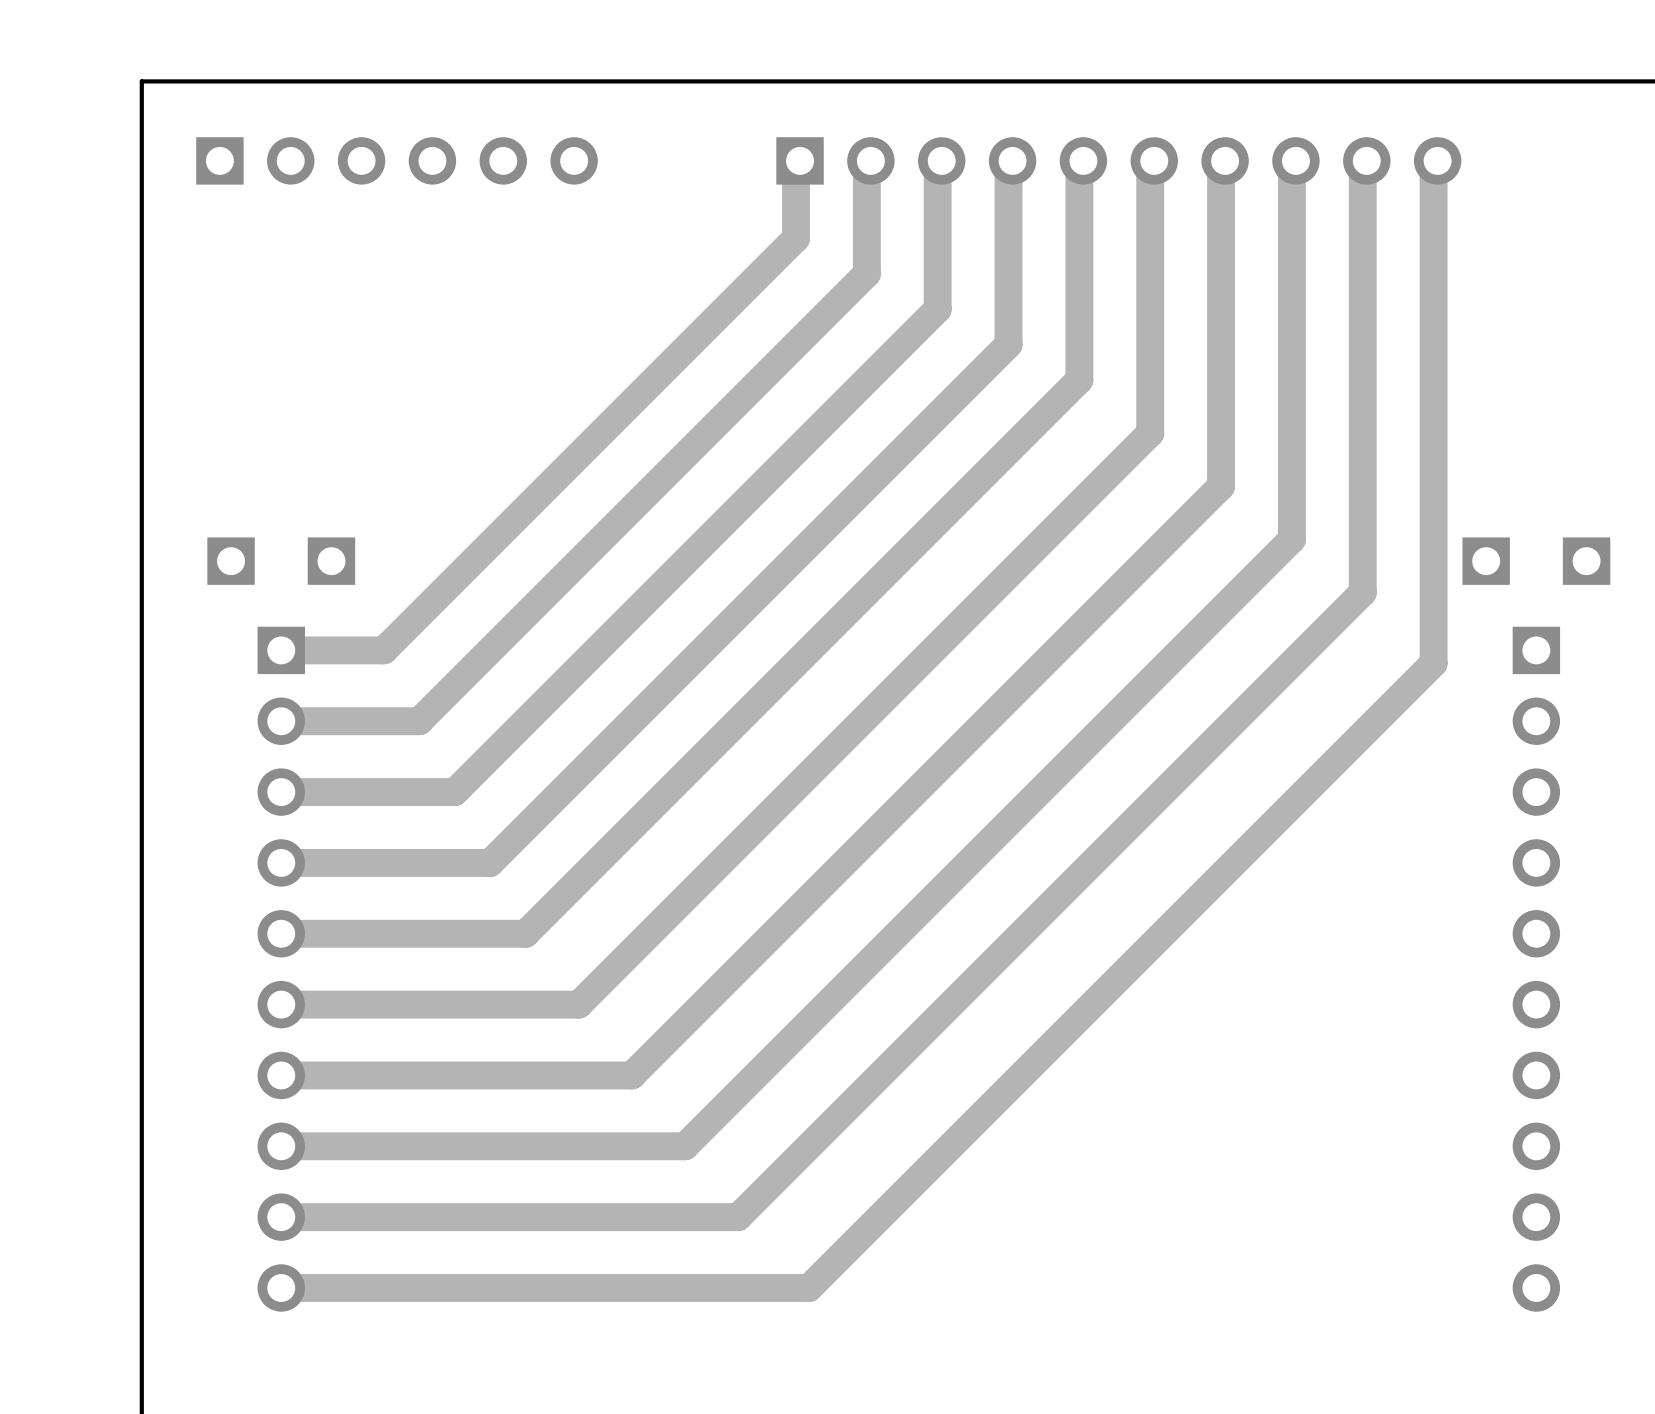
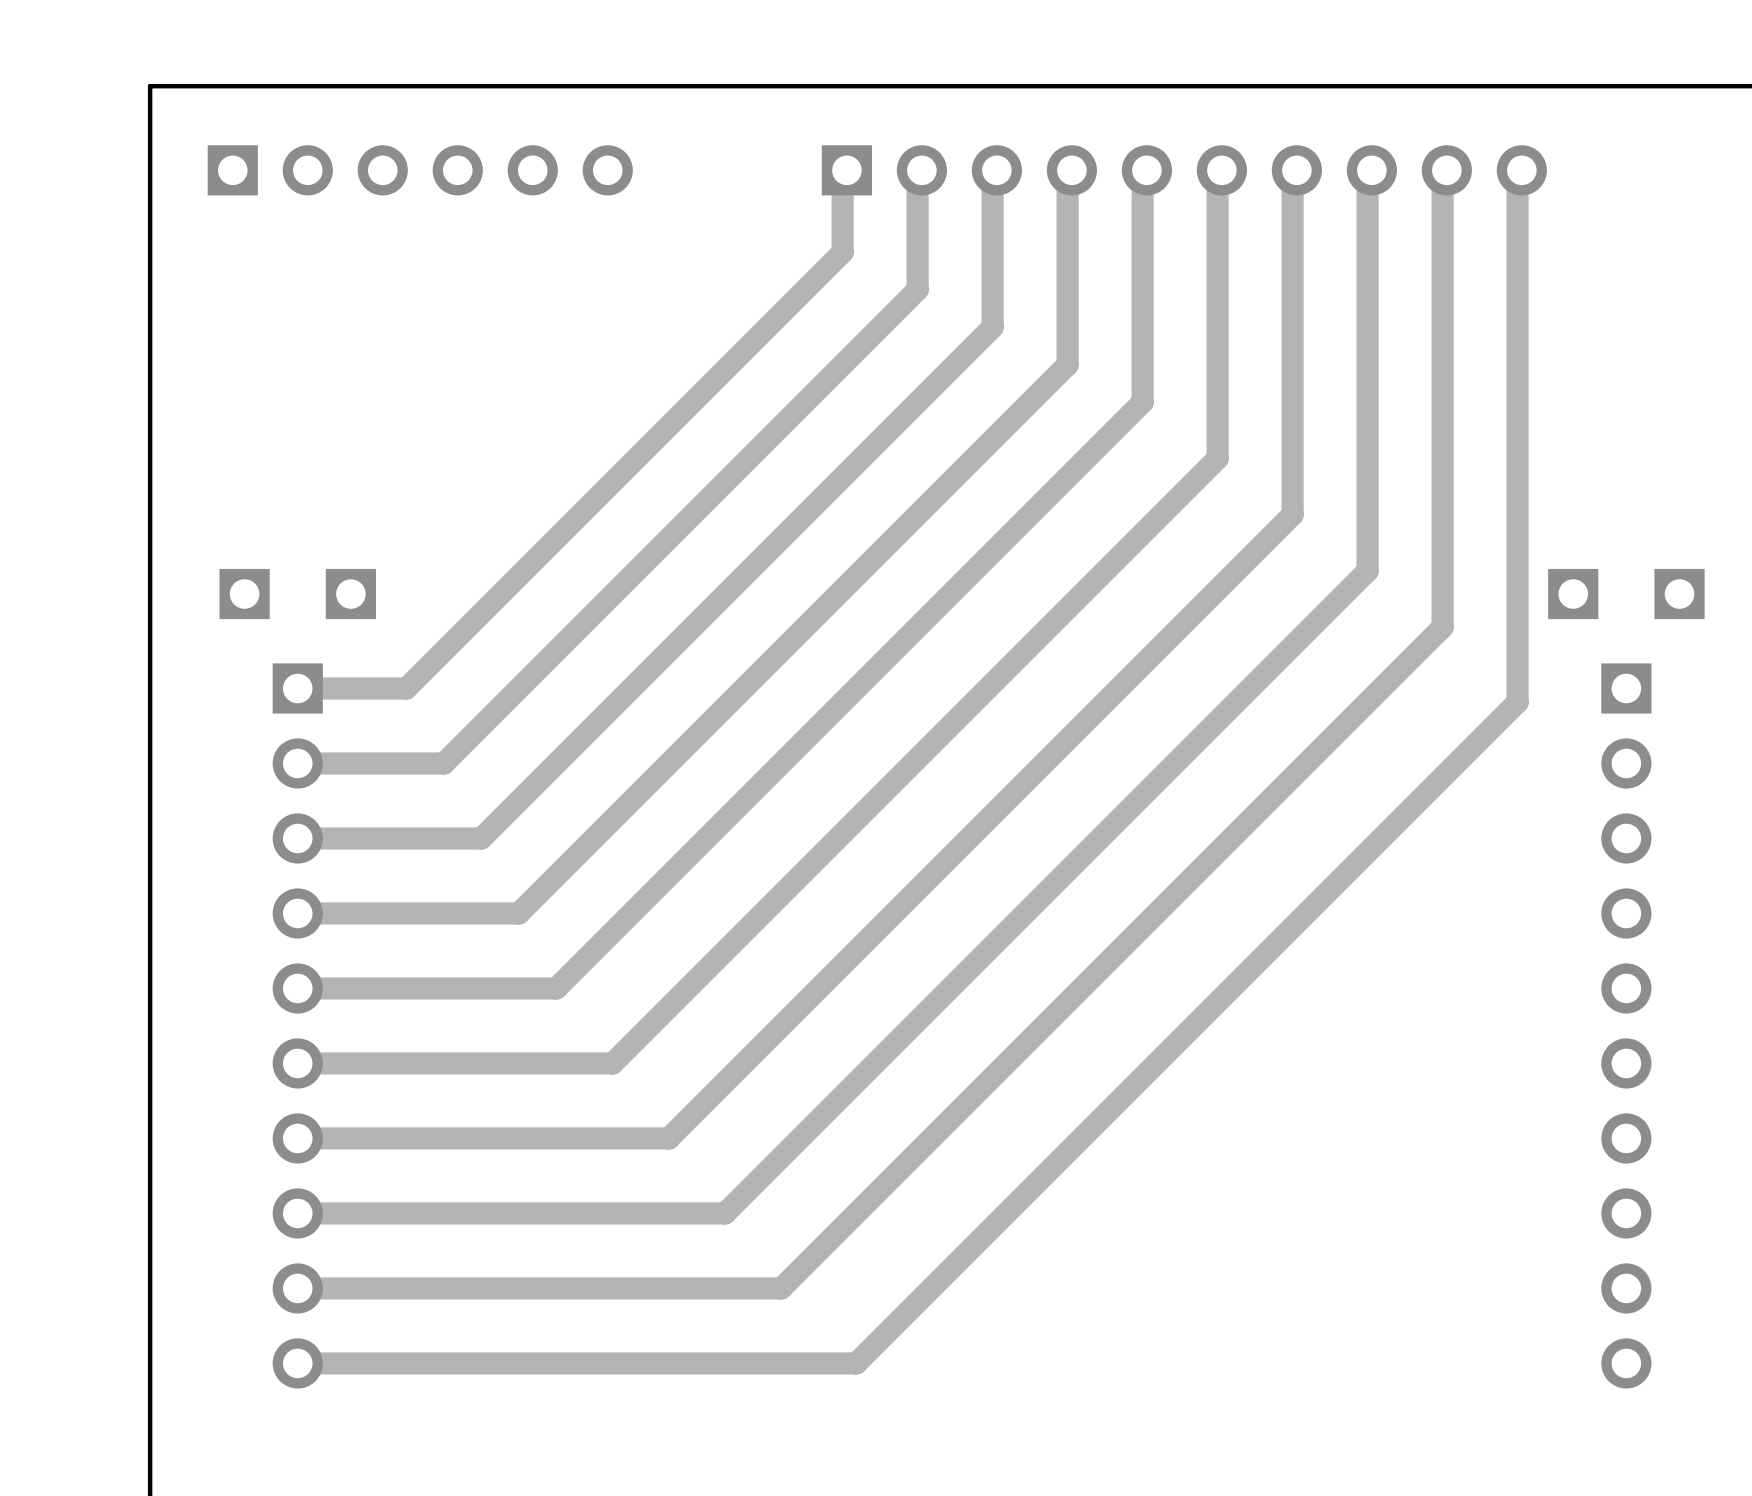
track width: thick (866, 163) (866, 273) (419, 721) (281, 721) -> thin (917, 173) (917, 289) (443, 763) (297, 763)
track width: thick (937, 163) (937, 309) (454, 792) (281, 792) -> thin (992, 173) (992, 327) (481, 838) (297, 838)
track width: thick (1008, 163) (1008, 344) (490, 862) (281, 862) -> thin (1067, 173) (1067, 364) (518, 913) (297, 913)
track width: thick (1079, 163) (1079, 379) (525, 933) (281, 933) -> thin (1142, 173) (1142, 402) (556, 988) (297, 988)
track width: thick (1150, 163) (1150, 433) (578, 1004) (281, 1004) -> thin (1217, 173) (1217, 458) (612, 1063) (297, 1063)
track width: thick (1221, 163) (1221, 486) (631, 1075) (281, 1075) -> thin (1292, 173) (1292, 514) (668, 1138) (297, 1138)
track width: thick (1291, 163) (1291, 539) (684, 1146) (281, 1146) -> thin (1367, 173) (1367, 570) (725, 1213) (297, 1213)
track width: thick (1362, 163) (1362, 592) (738, 1217) (281, 1217) -> thin (1442, 173) (1442, 627) (781, 1288) (297, 1288)
track width: thick (1433, 163) (1433, 663) (808, 1287) (281, 1287) -> thin (1517, 173) (1517, 702) (856, 1363) (297, 1363)
track width: thick (796, 170) (796, 238) (383, 650) (281, 650) -> thin (842, 180) (842, 252) (406, 688) (297, 688)

